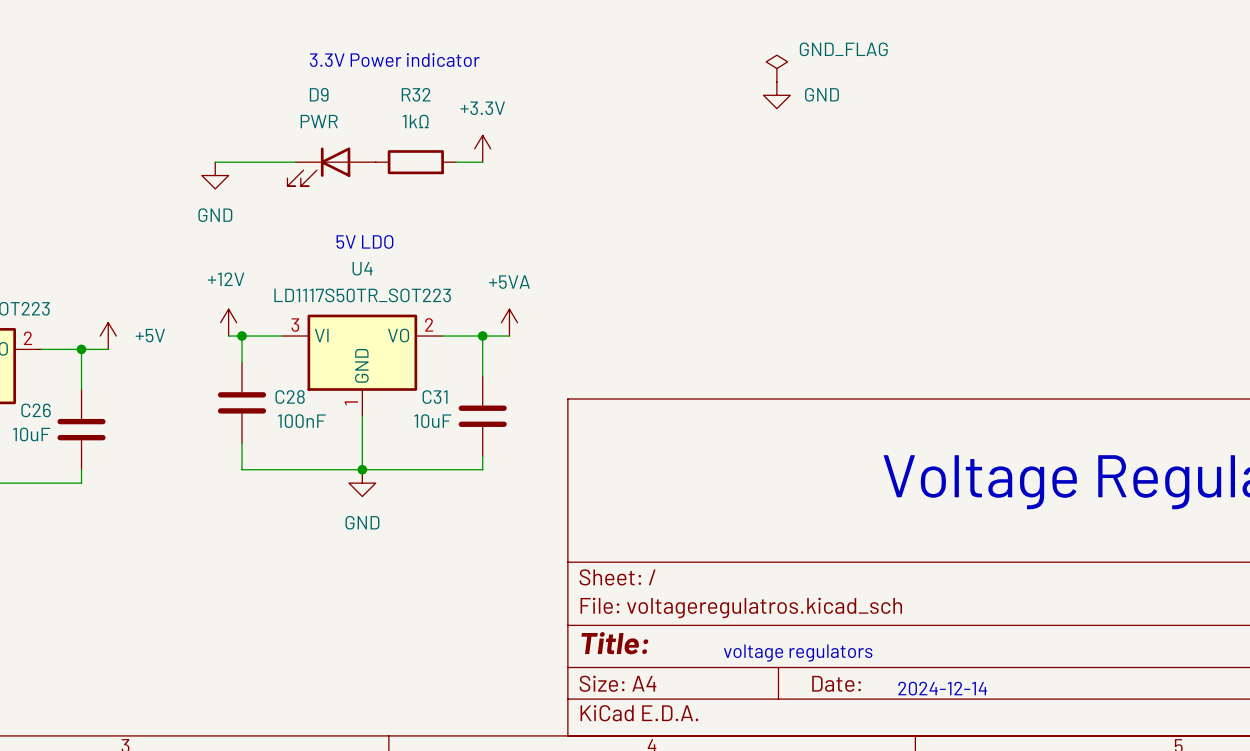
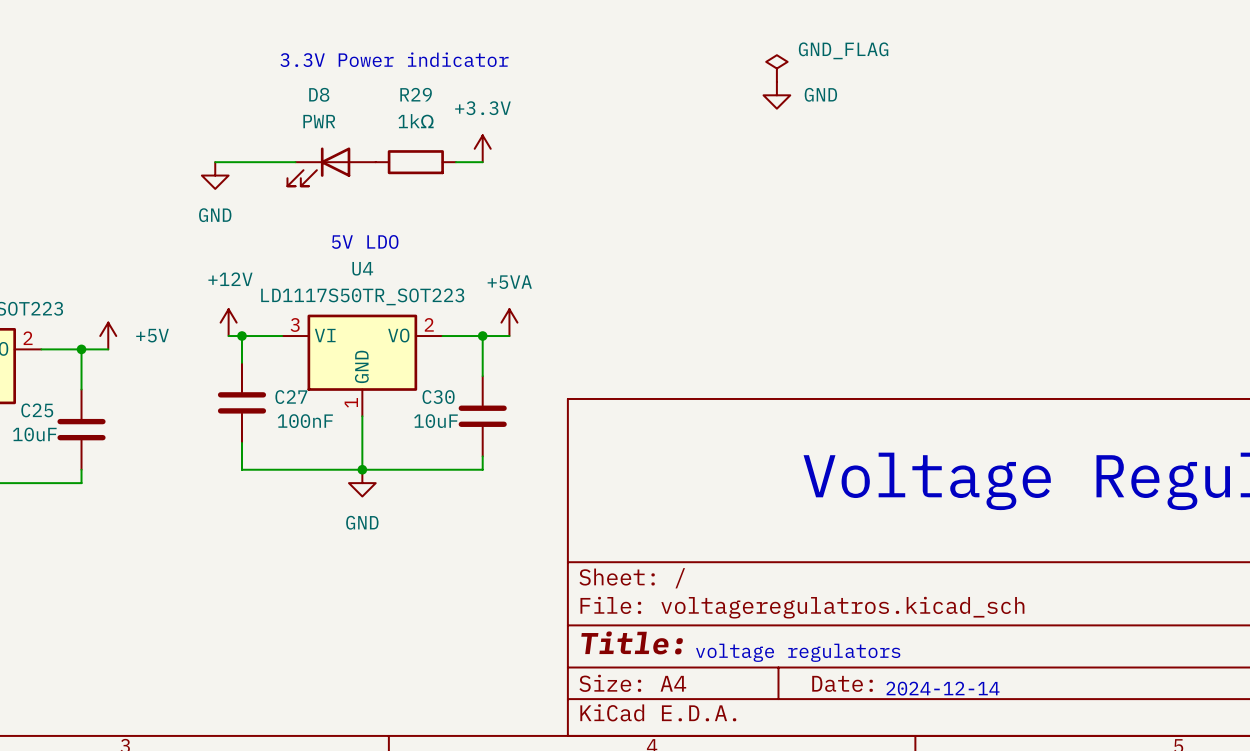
D9 name: D9 (319, 94) -> D8 (319, 94)
R32 name: R32 (416, 94) -> R29 (416, 94)
C28 name: C28 (290, 397) -> C27 (291, 397)
C31 name: C31 (435, 397) -> C30 (438, 397)
C26 name: C26 (36, 410) -> C25 (37, 410)

